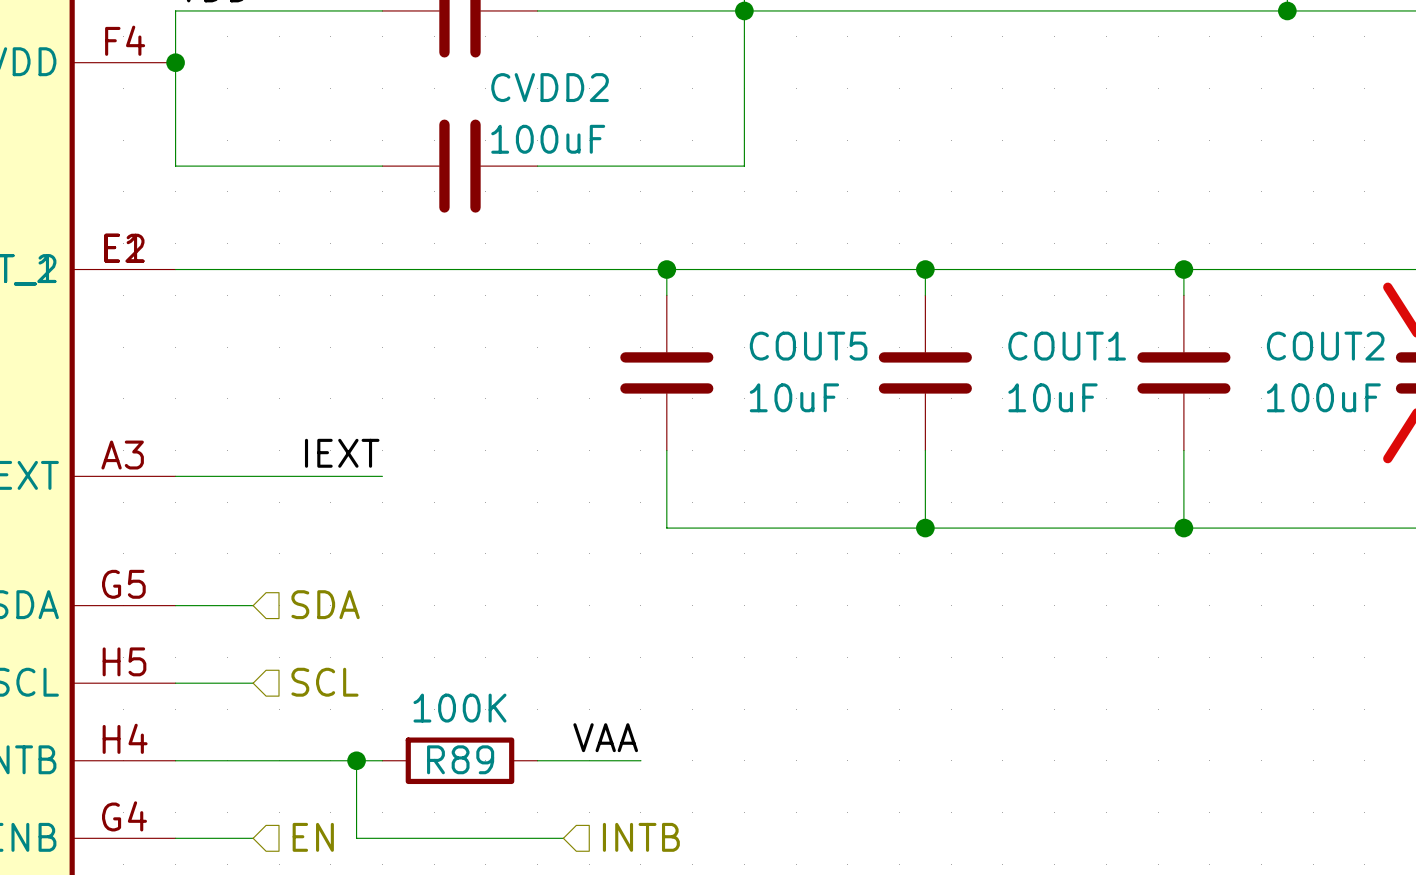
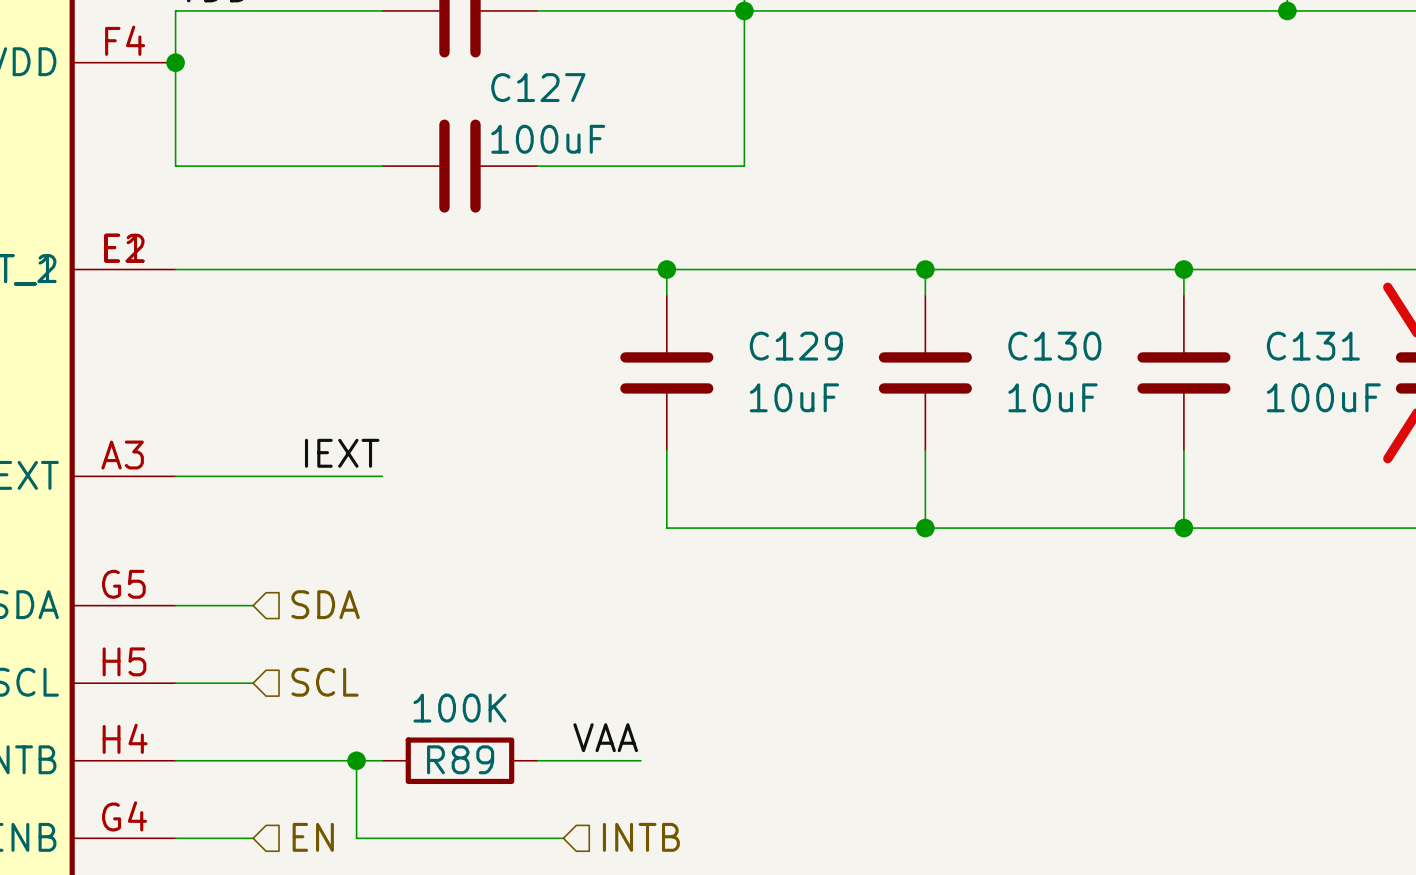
CVDD2 name: CVDD2 (550, 87) -> C127 (538, 87)
COUT5 name: COUT5 (808, 346) -> C129 (796, 346)
COUT1 name: COUT1 (1067, 346) -> C130 (1054, 346)
COUT2 name: COUT2 (1325, 346) -> C131 (1313, 346)

